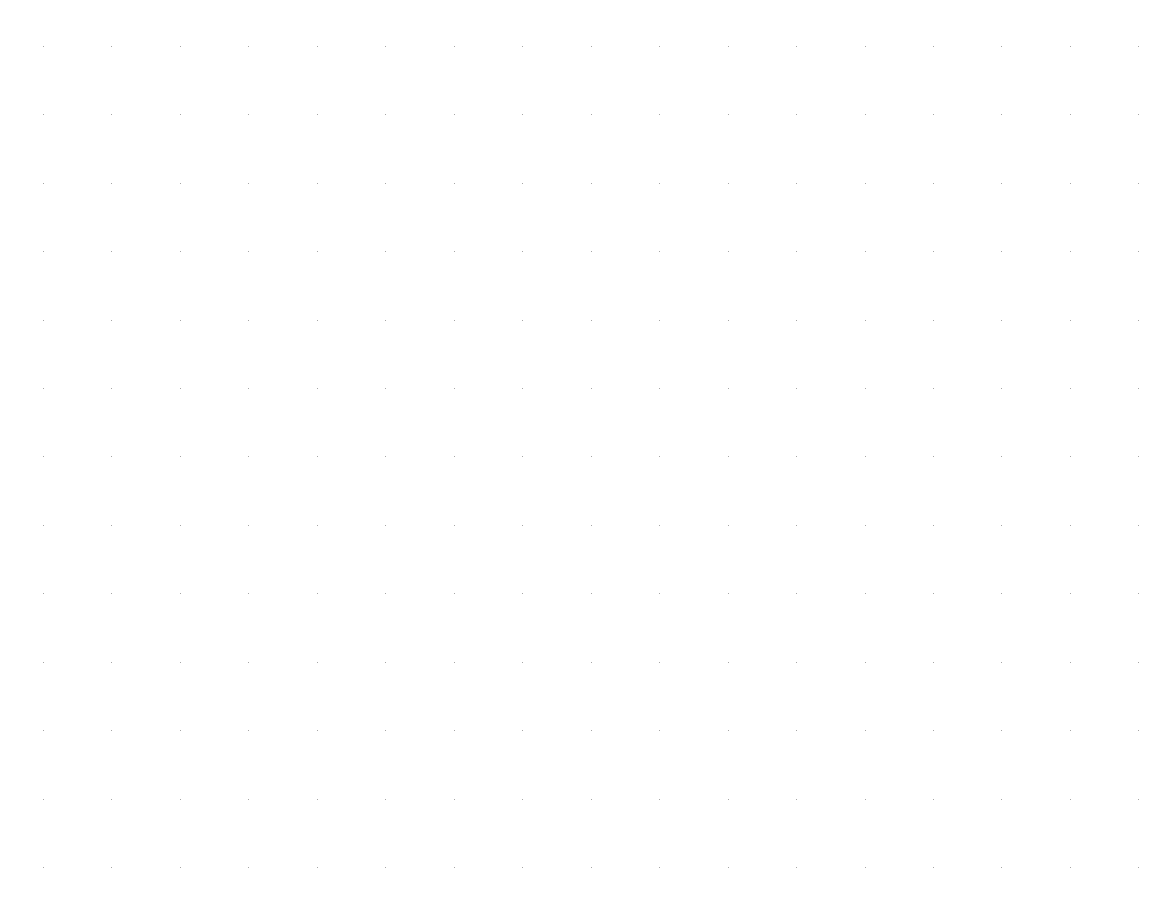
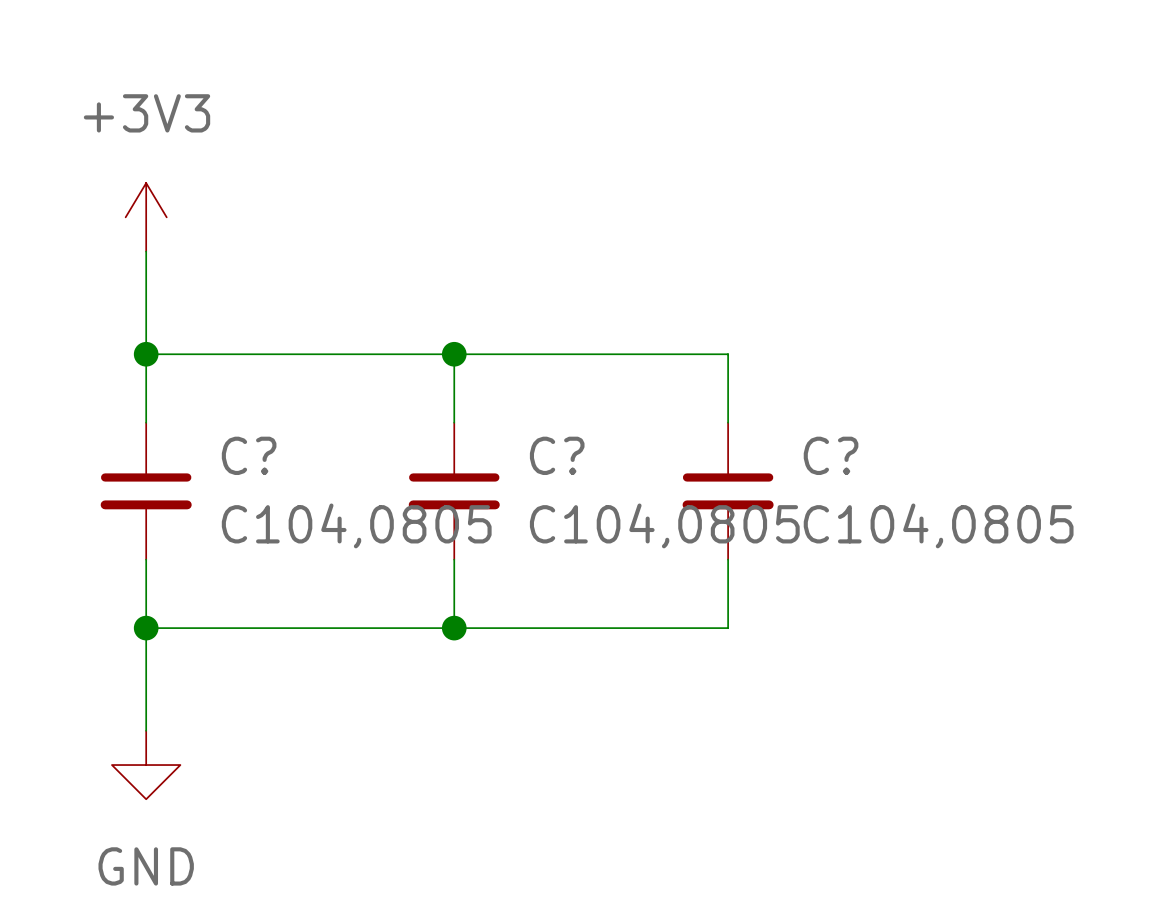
power symbol: none -> +3V3 (146, 217)
wire: none -> (146, 251) (146, 422)
wire: none -> (146, 354) (728, 354) (728, 422)
junction: none -> (146, 354)
wire: none -> (454, 354) (454, 422)
junction: none -> (454, 354)
C?: none -> C104,0805 (146, 491)
C?: none -> C104,0805 (454, 491)
C?: none -> C104,0805 (728, 491)
wire: none -> (146, 559) (146, 730)
wire: none -> (454, 559) (454, 628)
wire: none -> (728, 559) (728, 628) (146, 628)
junction: none -> (146, 628)
junction: none -> (454, 628)
power symbol: none -> GND (146, 765)

